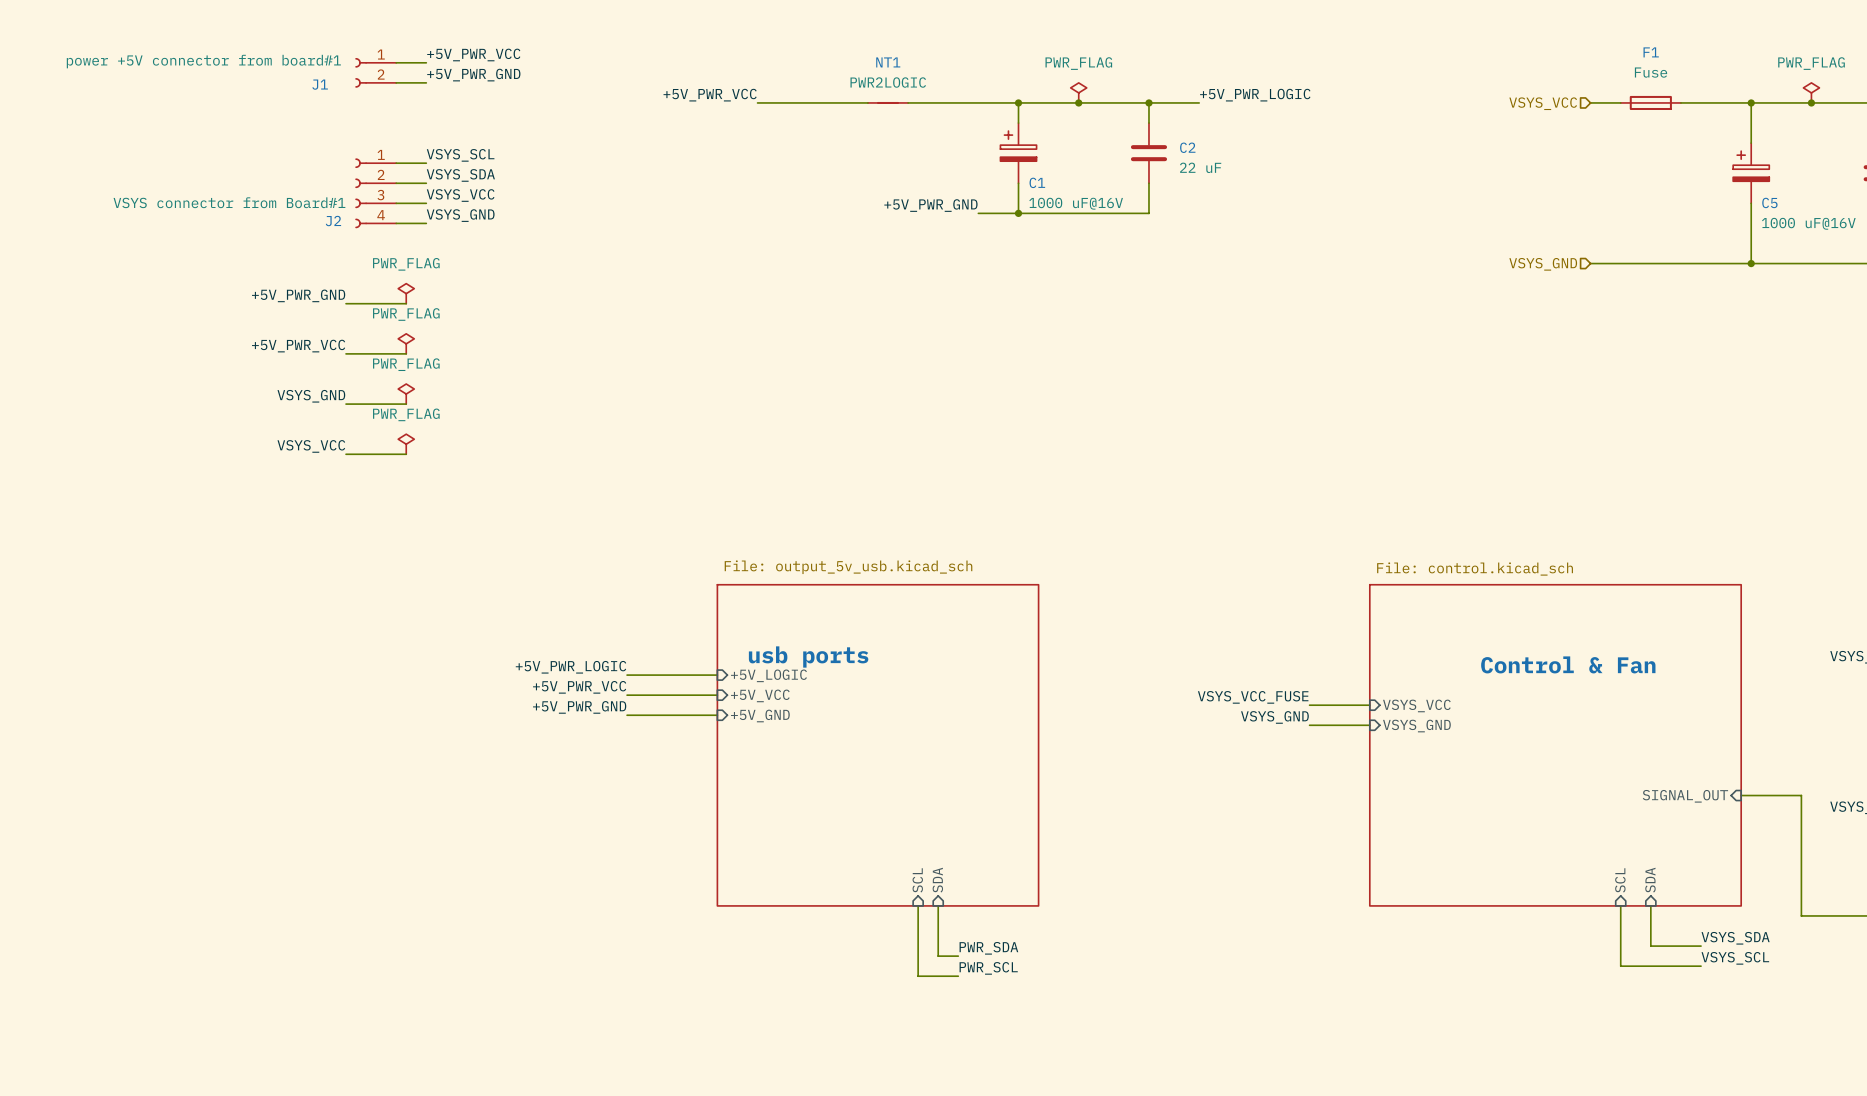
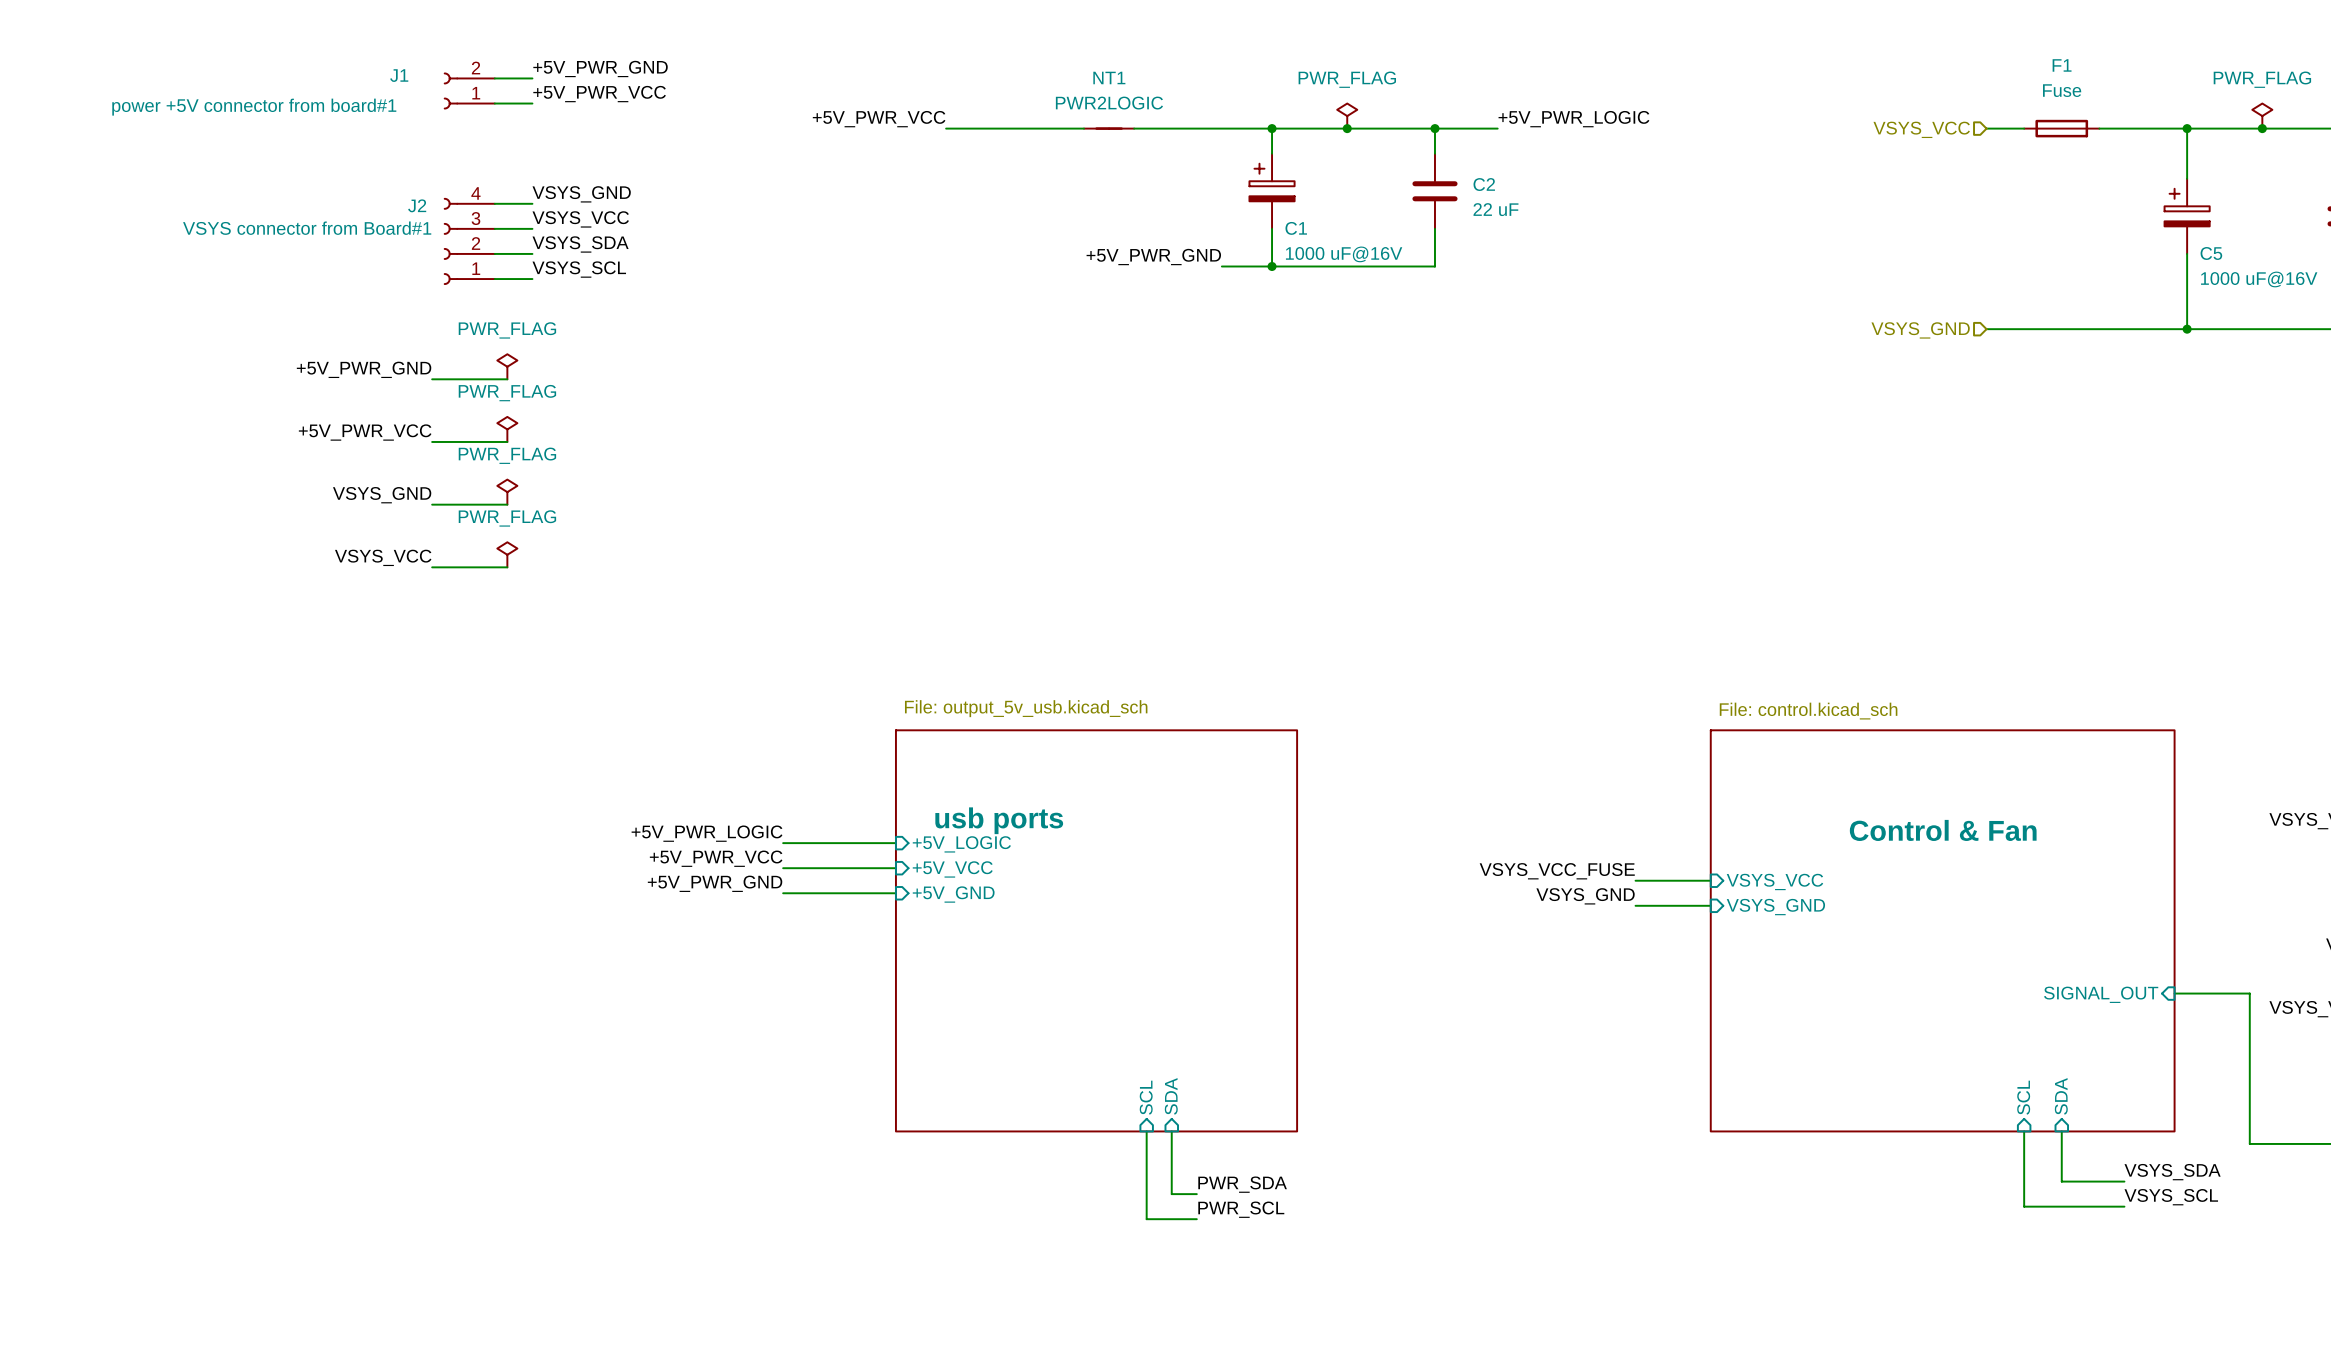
label: +5V_PWR_VCC (473, 54) -> +5V_PWR_GND (600, 68)
J1 flip: as is (361, 72) -> up-down (450, 90)
label: +5V_PWR_GND (473, 75) -> +5V_PWR_VCC (599, 94)
label: VSYS_SCL (460, 155) -> VSYS_GND (581, 194)
label: VSYS_SDA (460, 175) -> VSYS_VCC (580, 219)
J2 flip: as is (361, 193) -> up-down (450, 241)
label: VSYS_VCC (460, 195) -> VSYS_SDA (580, 244)
label: VSYS_GND (460, 215) -> VSYS_SCL (579, 269)

